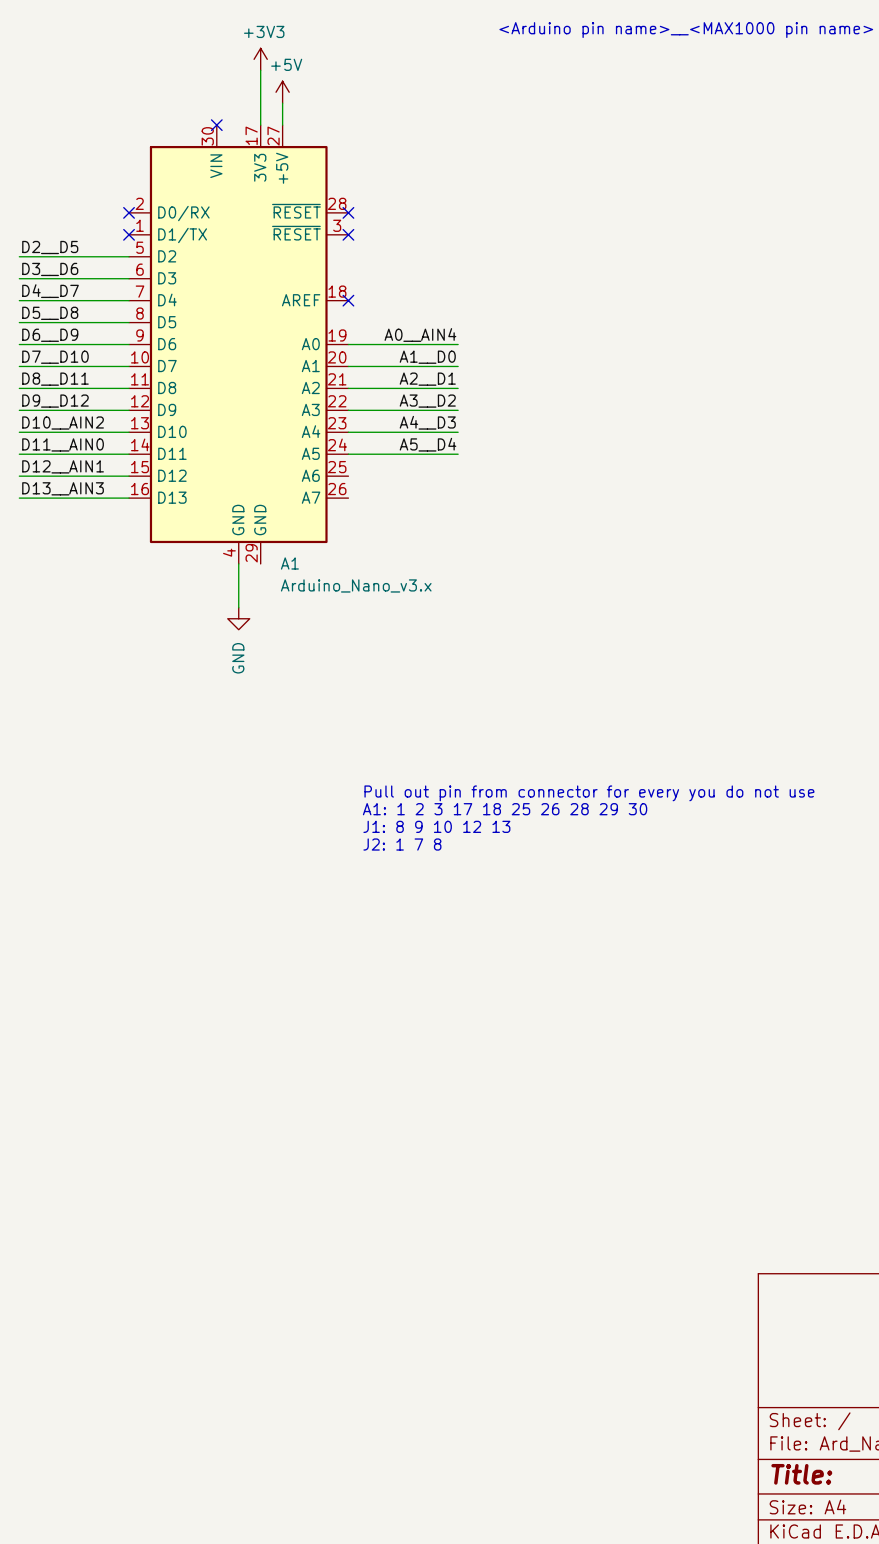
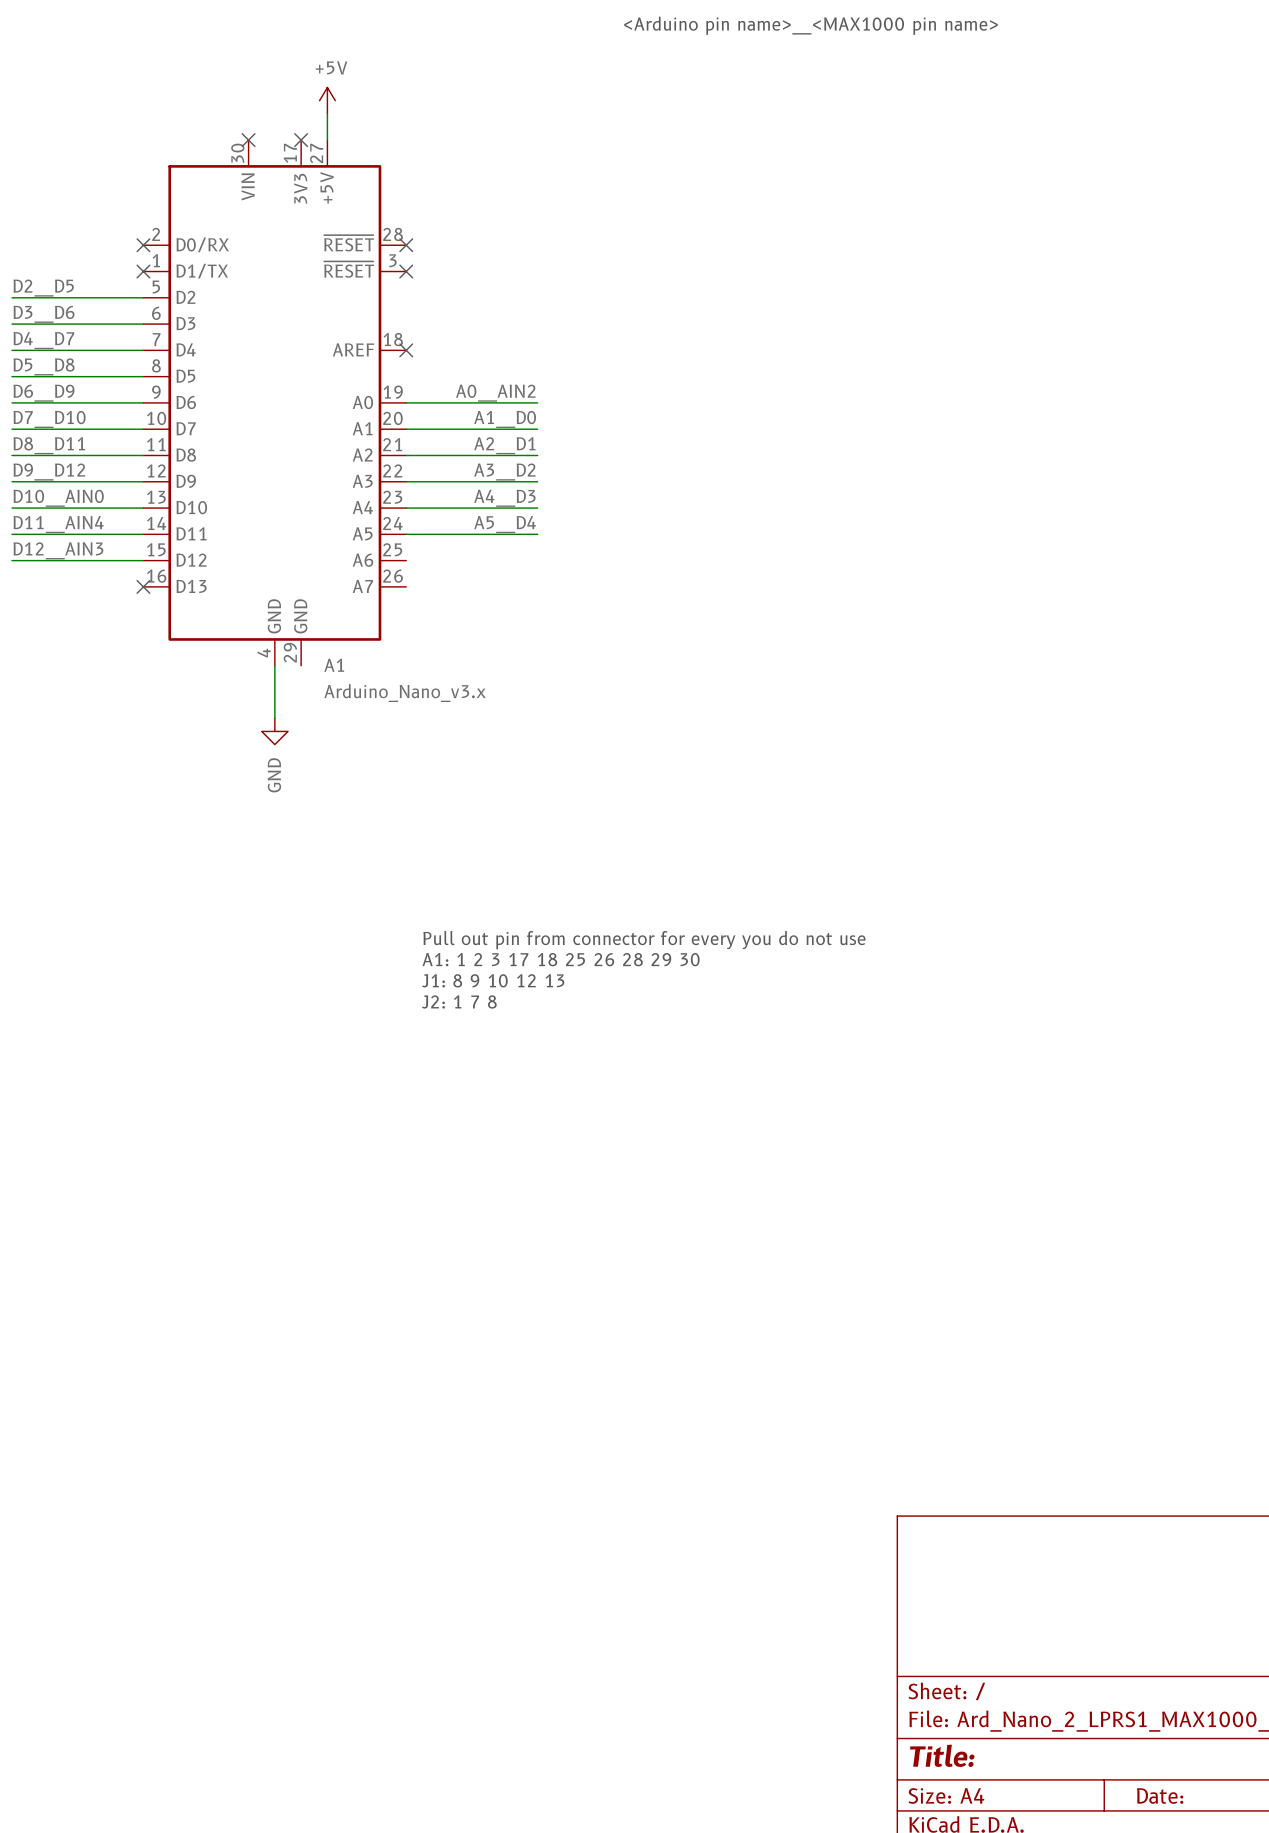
power symbol: +3V3 (260, 59) -> none
wire: (260, 70) (260, 125) -> none
no-connect mark: none -> (301, 140)
label: A0__AIN4 (420, 335) -> A0__AIN2 (495, 393)
label: D10__AIN2 (63, 423) -> D10__AIN0 (58, 498)
label: D11__AIN0 (63, 444) -> D11__AIN4 (58, 524)
label: D12__AIN1 (63, 466) -> D12__AIN3 (58, 550)
label: D13__AIN3 (63, 488) -> none
wire: (19, 498) (129, 498) -> none
no-connect mark: none -> (143, 586)

